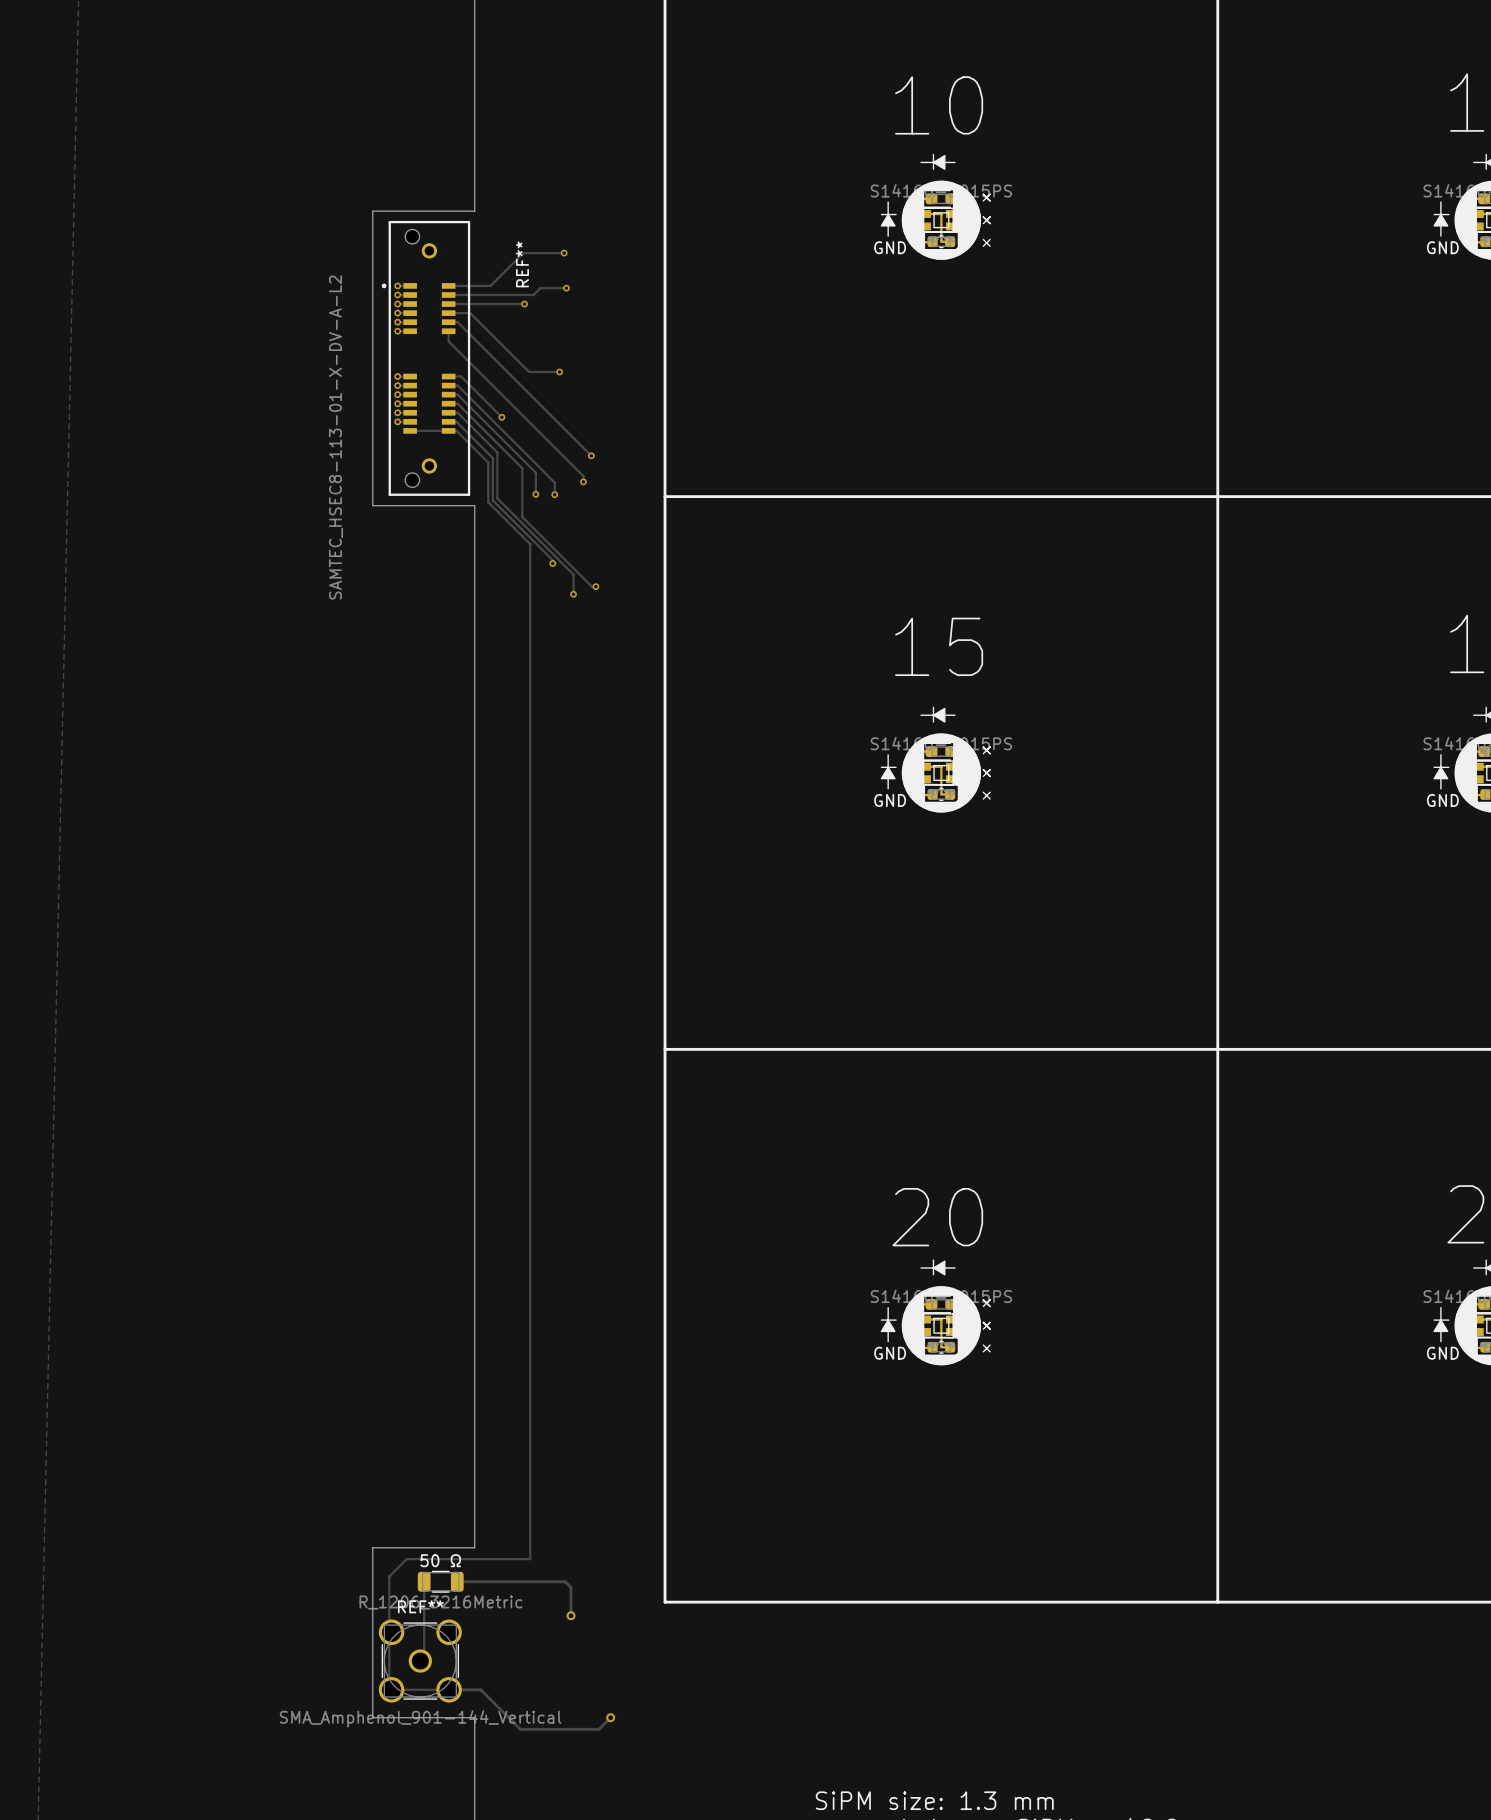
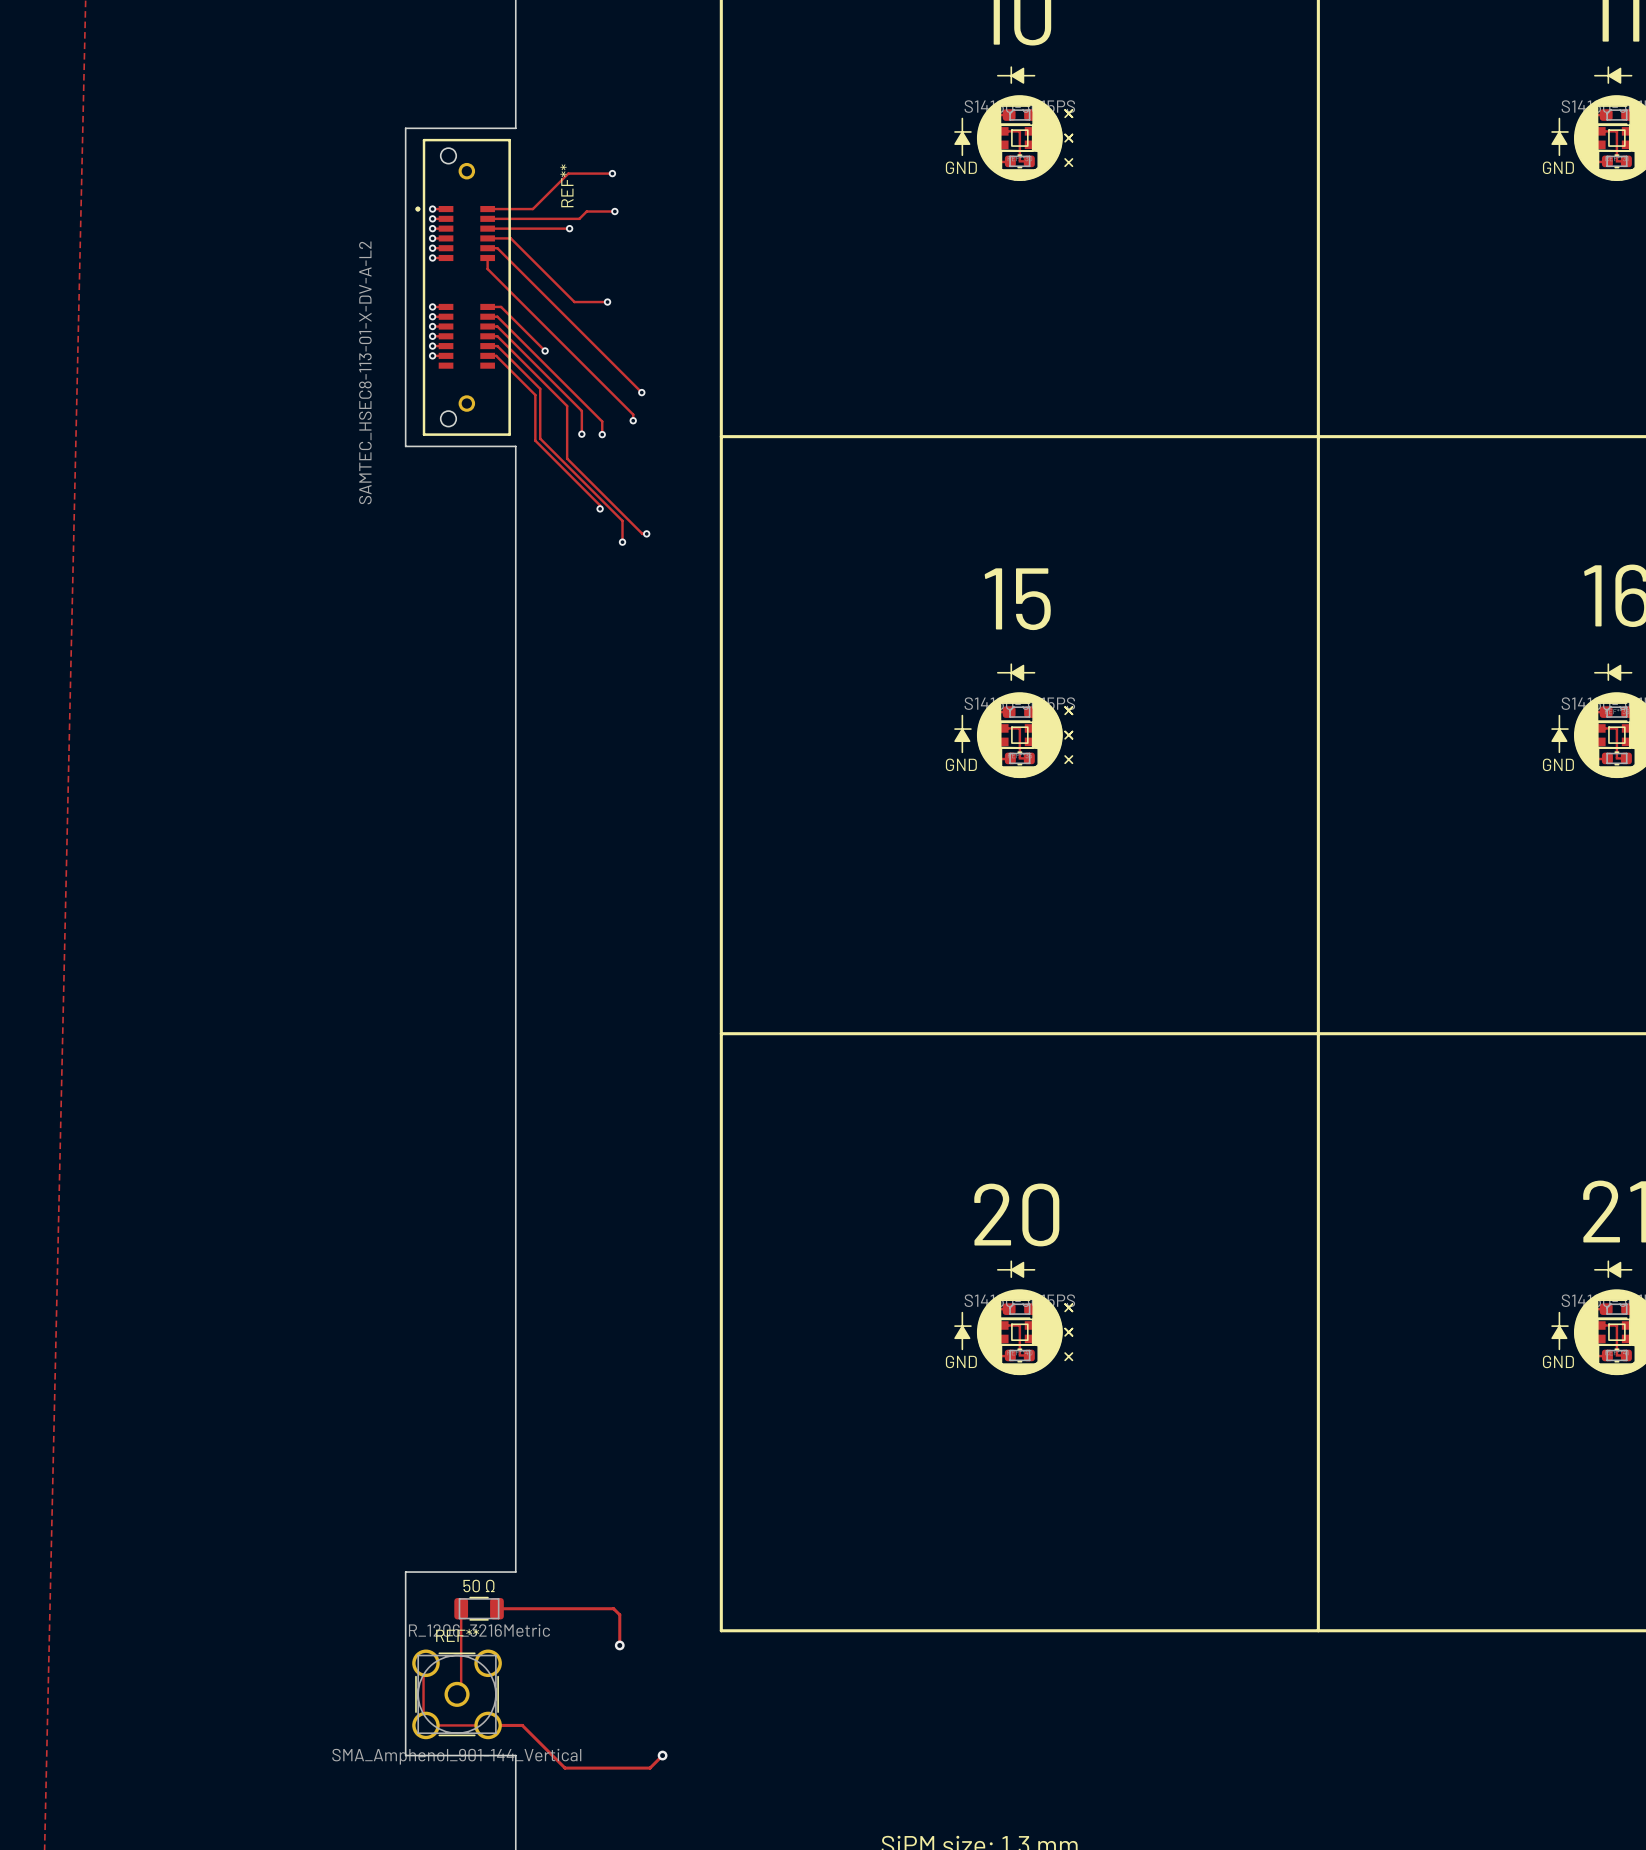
track: (410, 430) (456, 430) (488, 462) (488, 502) (530, 544) (530, 1559) (406, 1559) (389, 1576) (389, 1632) -> none

